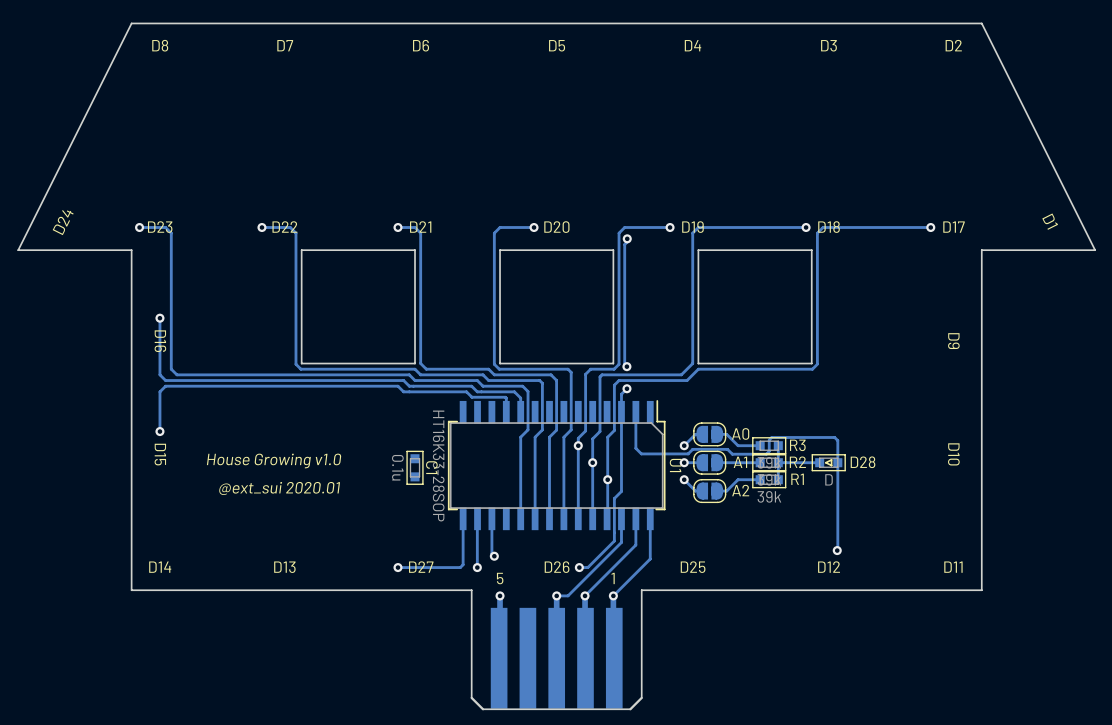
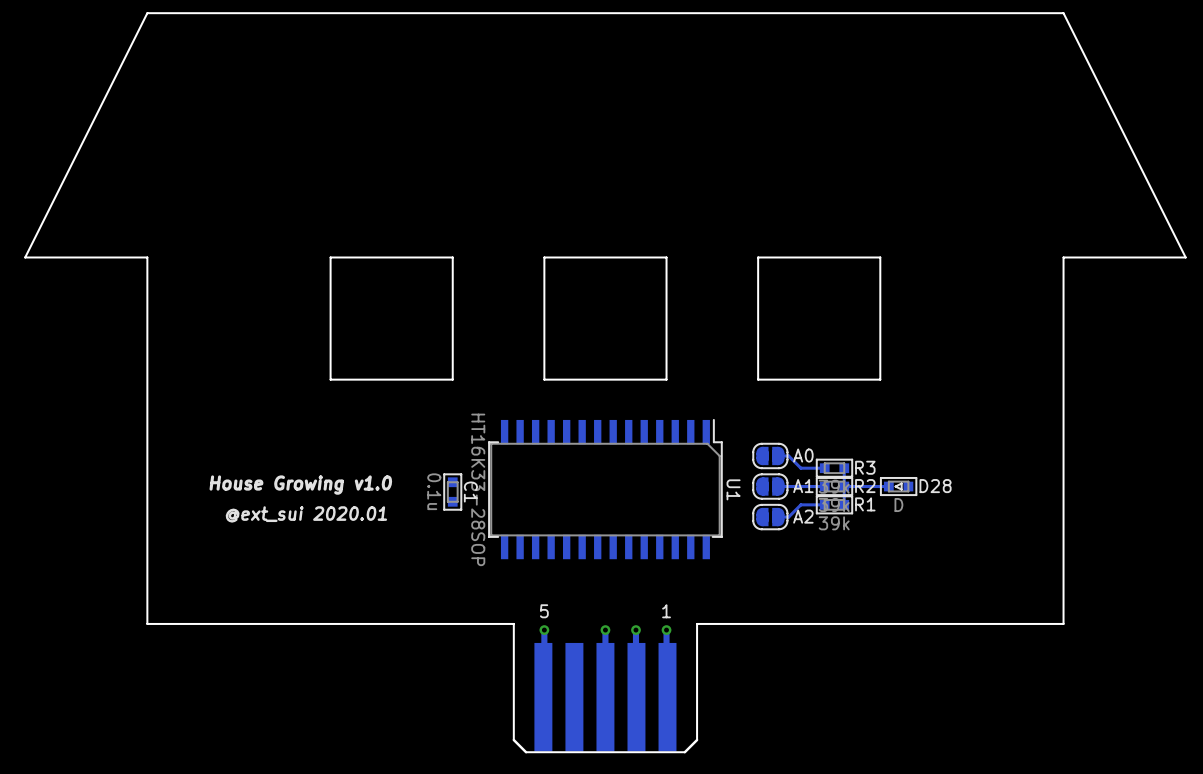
D8: (160, 45) -> none
D7: (285, 45) -> none
D6: (421, 45) -> none
D5: (557, 45) -> none
D4: (692, 45) -> none
D3: (828, 45) -> none
D2: (953, 45) -> none
D1: (1050, 221) -> none
D24: (63, 222) -> none
track: (139, 227) (165, 227) (171, 233) (171, 369) (176, 374) (409, 374) (415, 380) (477, 380) (483, 386) (522, 386) (528, 391) (528, 429) (520, 437) (520, 518) -> none
via: (139, 227) -> none
D23: (160, 227) -> none
track: (261, 227) (290, 227) (295, 233) (295, 364) (300, 369) (415, 369) (420, 374) (483, 374) (488, 380) (539, 380) (542, 383) (542, 429) (535, 437) (535, 518) -> none
via: (261, 227) -> none
D22: (284, 227) -> none
track: (398, 227) (415, 227) (420, 233) (420, 363) (426, 369) (488, 369) (494, 374) (551, 374) (556, 380) (556, 430) (549, 437) (549, 518) -> none
via: (398, 227) -> none
D21: (420, 227) -> none
track: (534, 227) (500, 227) (494, 233) (494, 364) (499, 369) (568, 369) (571, 372) (571, 429) (563, 437) (563, 518) -> none
via: (534, 227) -> none
D20: (556, 227) -> none
track: (670, 227) (624, 227) (619, 233) (619, 364) (614, 369) (590, 369) (585, 374) (585, 430) (578, 438) (578, 518) -> none
via: (670, 227) -> none
D19: (692, 227) -> none
track: (806, 227) (698, 227) (692, 233) (692, 363) (681, 374) (602, 374) (600, 376) (600, 431) (592, 438) (592, 518) -> none
via: (806, 227) -> none
D18: (829, 227) -> none
track: (930, 227) (823, 227) (817, 233) (817, 363) -> none
via: (930, 227) -> none
D17: (954, 227) -> none
track: (627, 238) (624, 244) (624, 364) (626, 366) -> none
via: (627, 238) -> none
track: (159, 318) (159, 374) (165, 380) (403, 380) (409, 386) (471, 386) (477, 391) (514, 391) (520, 398) (520, 412) -> none
via: (159, 318) -> none
D16: (160, 341) -> none
D9: (953, 341) -> none
track: (817, 364) (812, 369) (698, 369) (687, 380) (619, 380) (614, 385) (614, 430) (607, 437) (607, 518) -> none
via: (626, 366) -> none
track: (626, 388) (621, 394) (621, 491) (614, 498) (614, 541) (587, 567) (579, 567) -> none
via: (626, 388) -> none
track: (506, 412) (505, 397) (471, 397) (466, 391) (403, 391) (398, 386) (165, 386) (159, 391) (159, 431) -> none
track: (635, 412) (635, 448) (641, 453) (688, 453) (692, 449) (727, 449) (732, 454) (766, 454) (769, 451) (769, 440) (771, 437) (834, 437) (837, 440) (837, 550) -> none
via: (159, 431) -> none
track: (702, 434) (695, 434) (684, 445) -> none
via: (578, 445) -> none
via: (684, 445) -> none
D15: (160, 454) -> none
D10: (953, 454) -> none
via: (592, 462) -> none
via: (684, 462) -> none
track: (702, 462) (684, 462) -> none
via: (607, 479) -> none
track: (684, 479) (695, 491) (702, 491) -> none
via: (684, 479) -> none
track: (463, 518) (463, 564) (460, 567) (398, 567) -> none
track: (477, 518) (477, 567) -> none
track: (491, 518) (491, 553) (494, 556) -> none
track: (621, 518) (621, 542) (568, 595) (556, 595) -> none
track: (635, 518) (635, 545) (585, 595) -> none
track: (650, 518) (650, 559) (613, 595) -> none
via: (837, 550) -> none
via: (494, 556) -> none
D14: (160, 567) -> none
D13: (284, 567) -> none
via: (398, 567) -> none
D27: (421, 567) -> none
via: (477, 567) -> none
D26: (557, 567) -> none
via: (579, 567) -> none
D25: (693, 567) -> none
D12: (829, 567) -> none
D11: (953, 567) -> none

